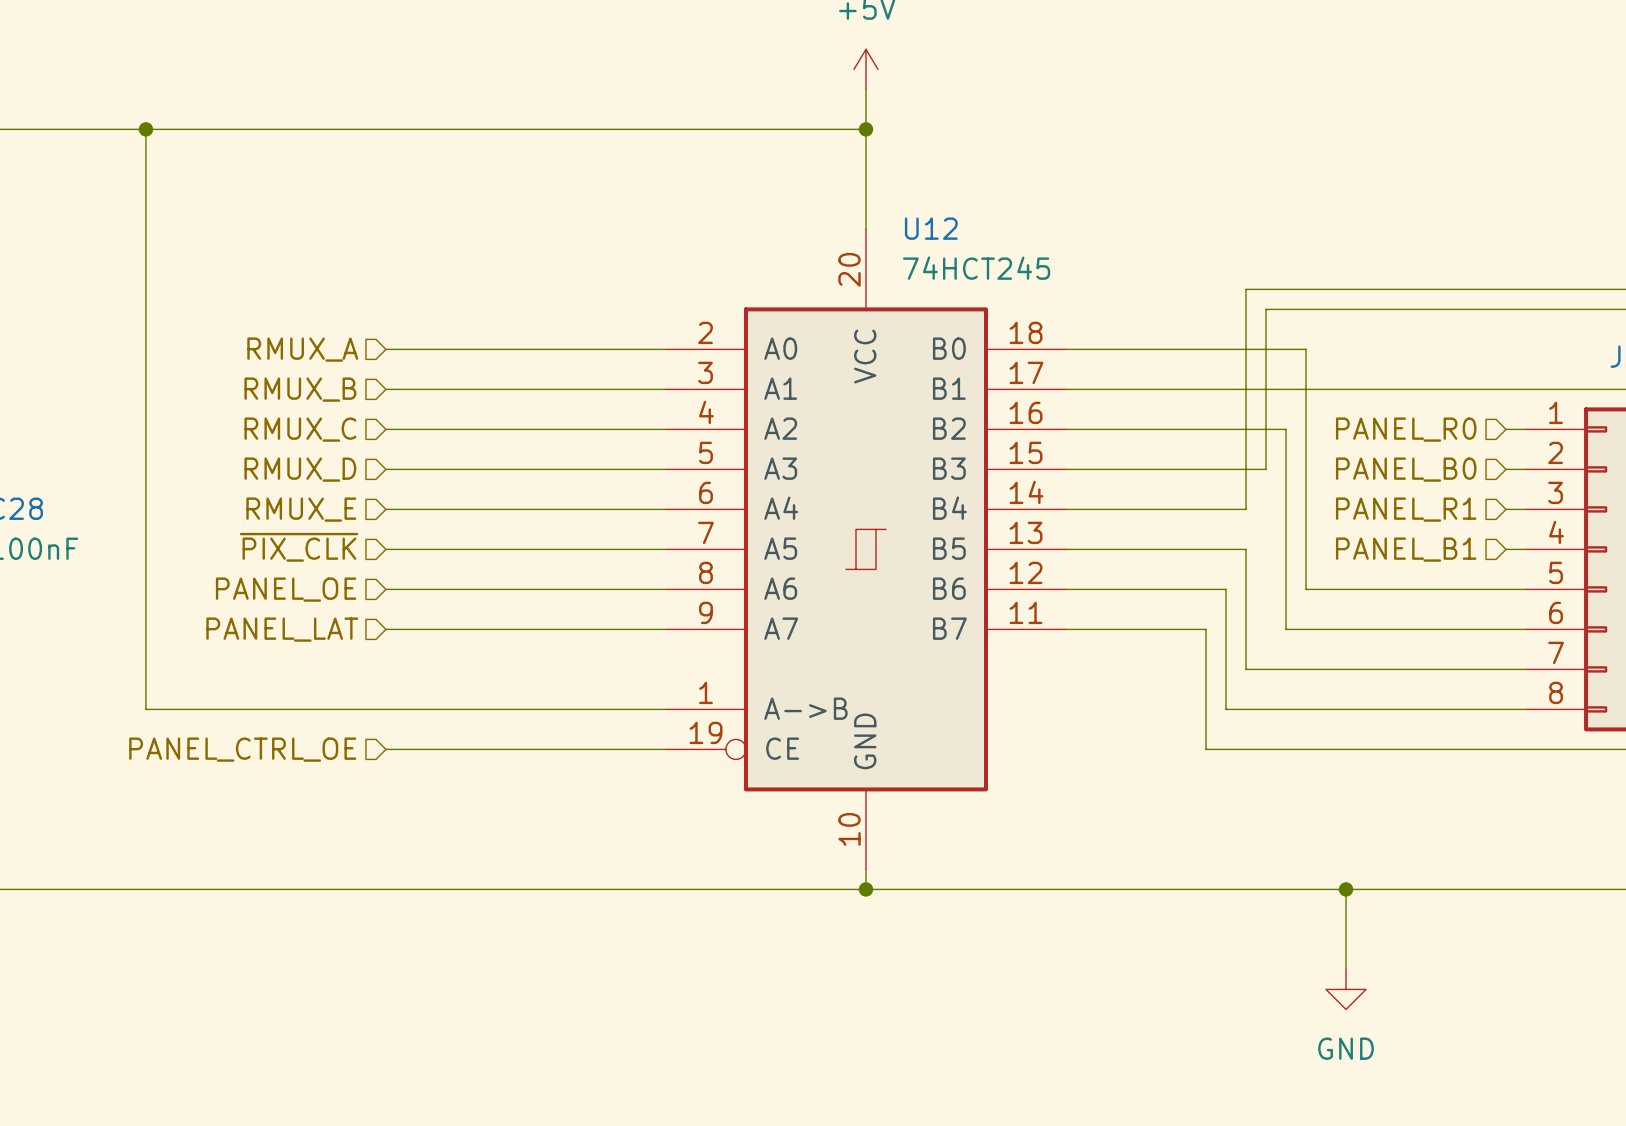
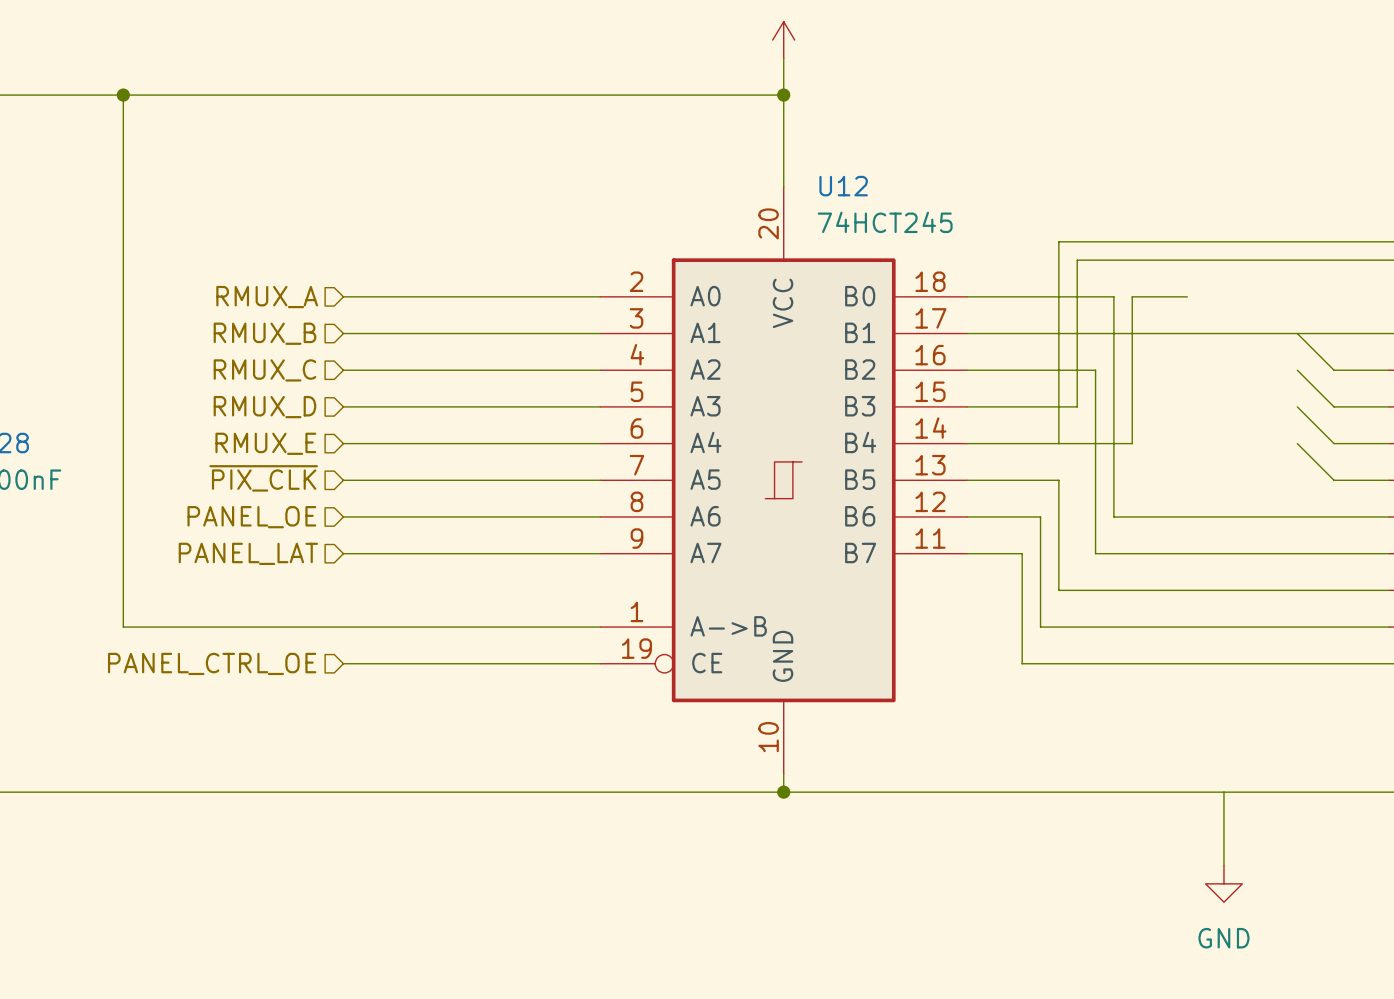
wire: (1246, 289) (1246, 349) (1226, 349) -> (1132, 241) (1058, 241) (1058, 443)
wire: (1266, 309) (1266, 469) (1186, 469) -> (1150, 260) (1077, 260) (1077, 406)
wire: (1306, 349) (1306, 589) -> (1113, 296) (1113, 516) (1187, 516)
wire: none -> (1297, 333) (1334, 370) (1370, 370)
wire: (1206, 429) (1286, 429) (1286, 629) -> (1095, 370) (1095, 553) (1168, 553)
hierarchical label: PANEL_R0 (1406, 429) -> none
wire: none -> (1297, 370) (1334, 406) (1370, 406)
hierarchical label: PANEL_B0 (1406, 469) -> none
wire: none -> (1297, 406) (1334, 443) (1370, 443)
hierarchical label: PANEL_R1 (1406, 509) -> none
wire: none -> (1297, 443) (1334, 480) (1370, 480)
wire: (1166, 549) (1246, 549) (1246, 669) -> (1058, 480) (1058, 590) (1132, 590)
hierarchical label: PANEL_B1 (1406, 549) -> none
wire: (1146, 589) (1226, 589) (1226, 709) -> (1040, 516) (1040, 627) (1113, 627)
wire: (1126, 629) (1206, 629) (1206, 749) -> (1022, 553) (1022, 663) (1095, 663)
junction: (1346, 889) -> none

